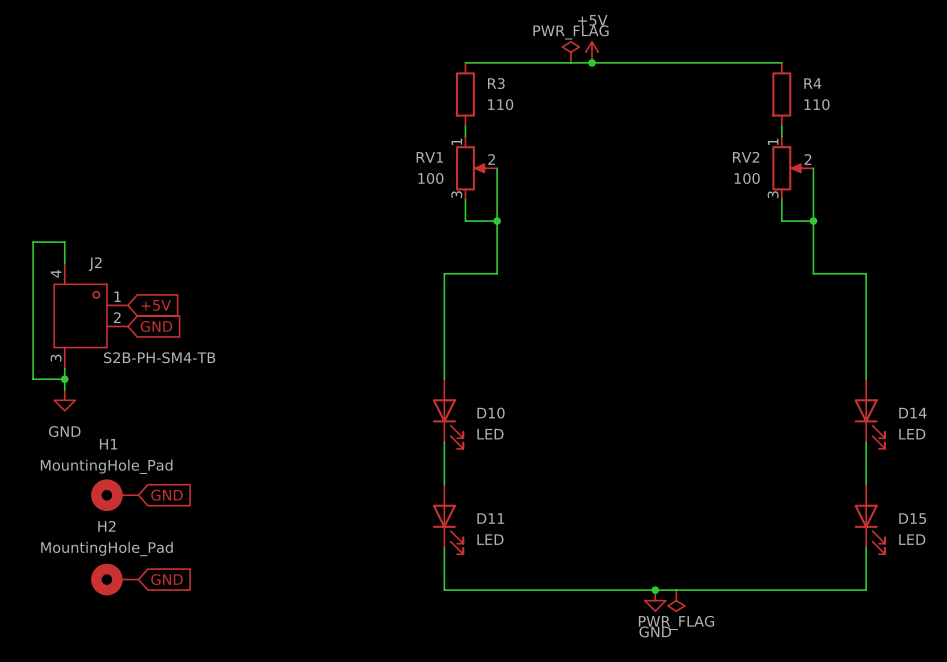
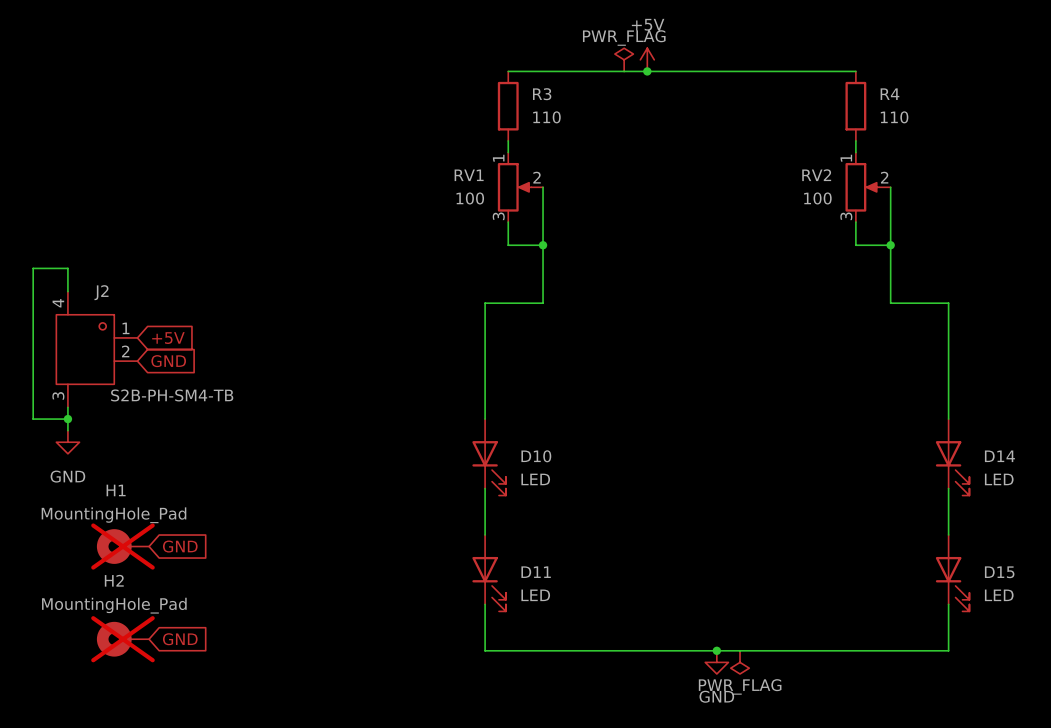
H1 do-not-place cross: none -> (122, 546)
H2 do-not-place cross: none -> (122, 639)

